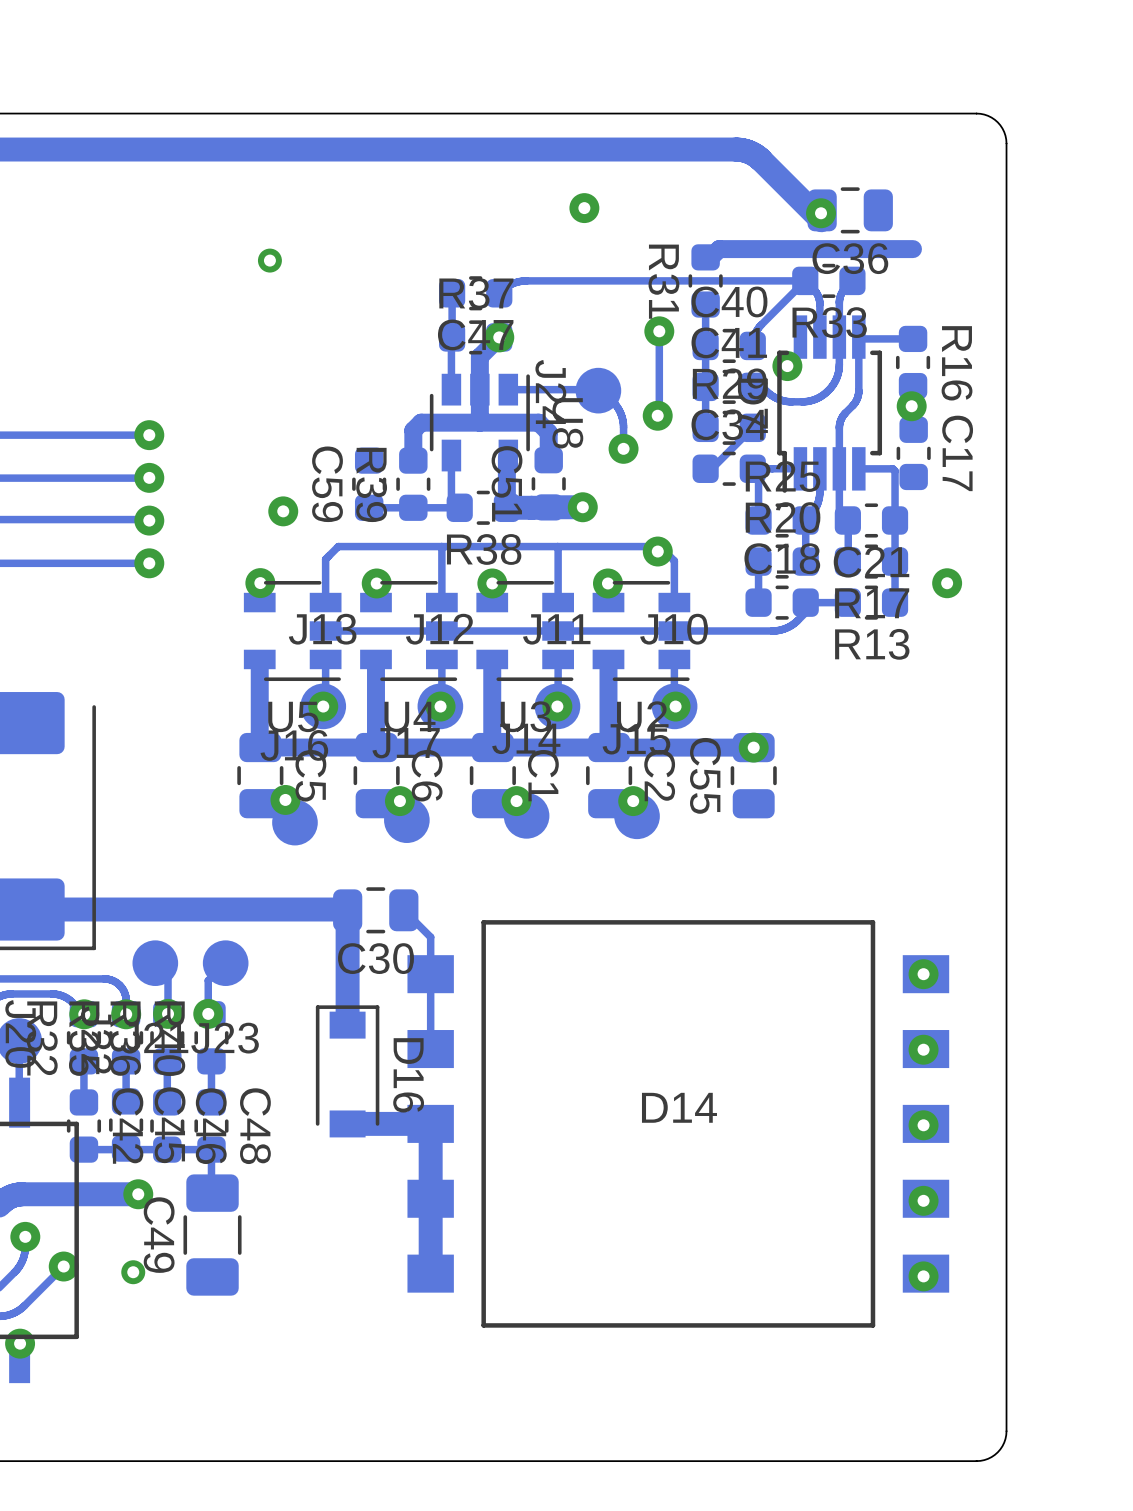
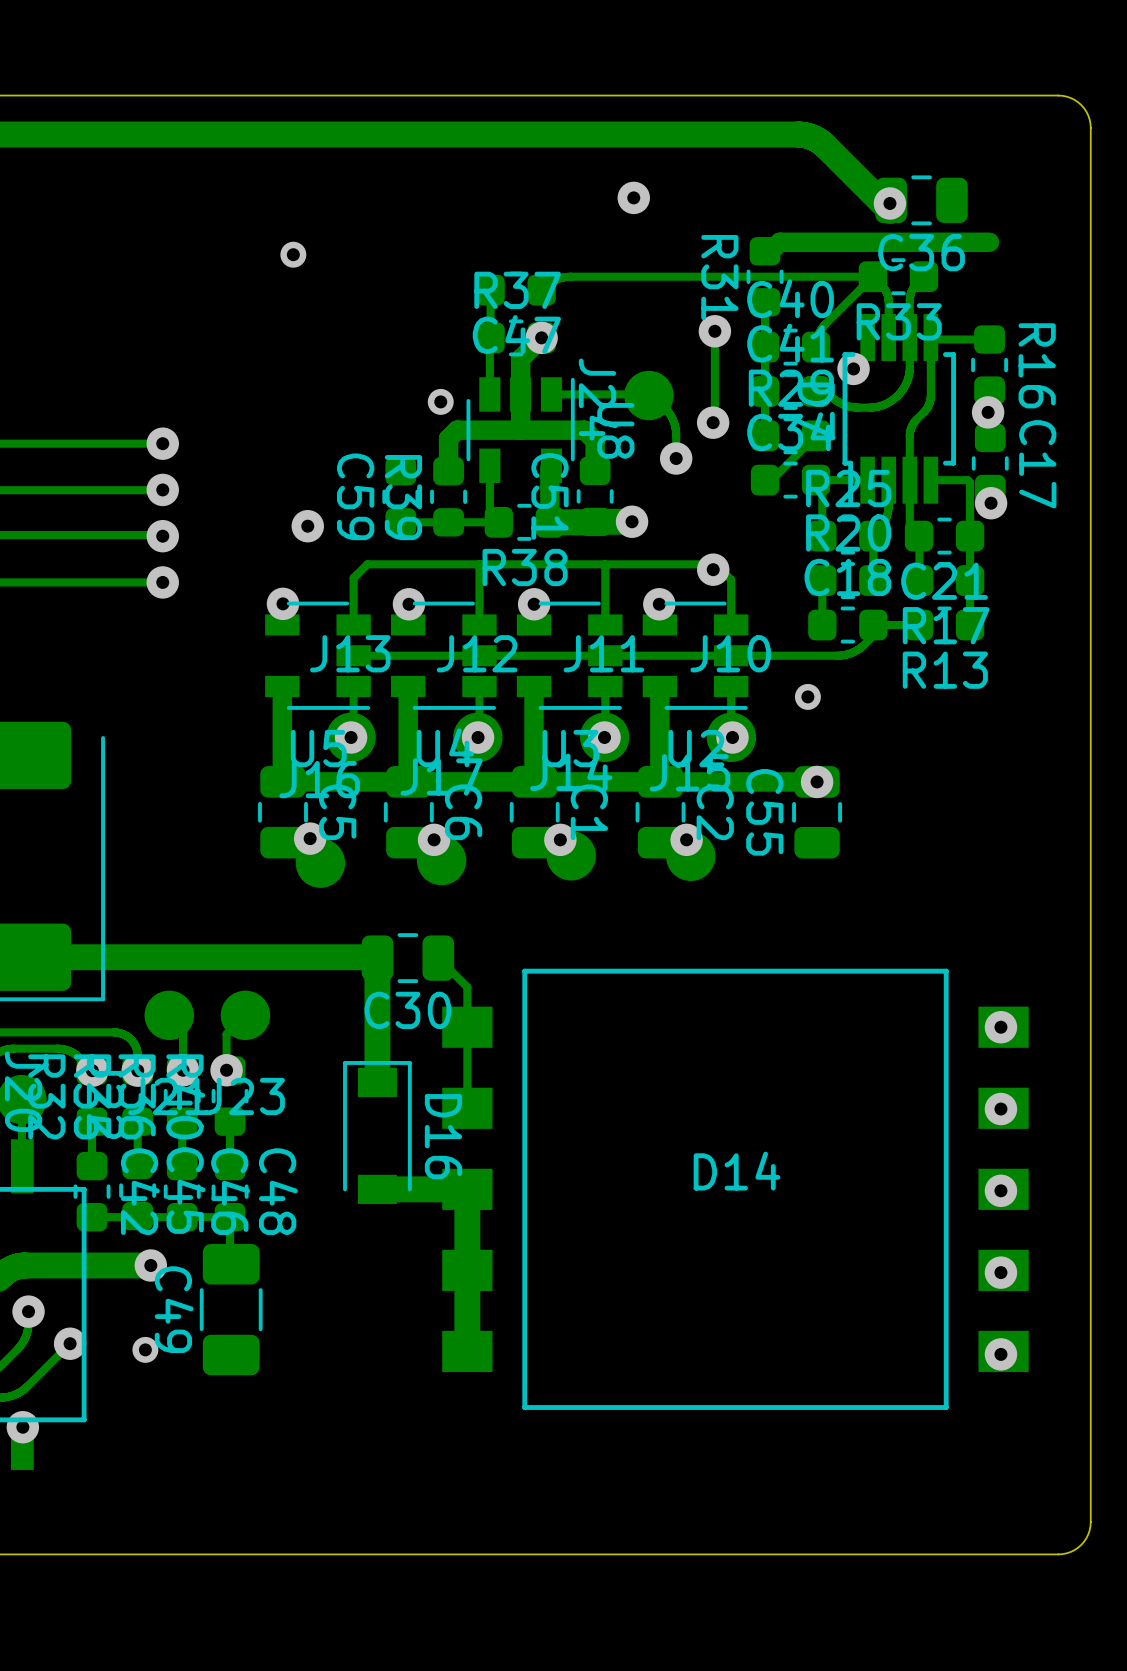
via: none -> (440, 401)
via position: (947, 583) -> (991, 503)
via: none -> (807, 696)

